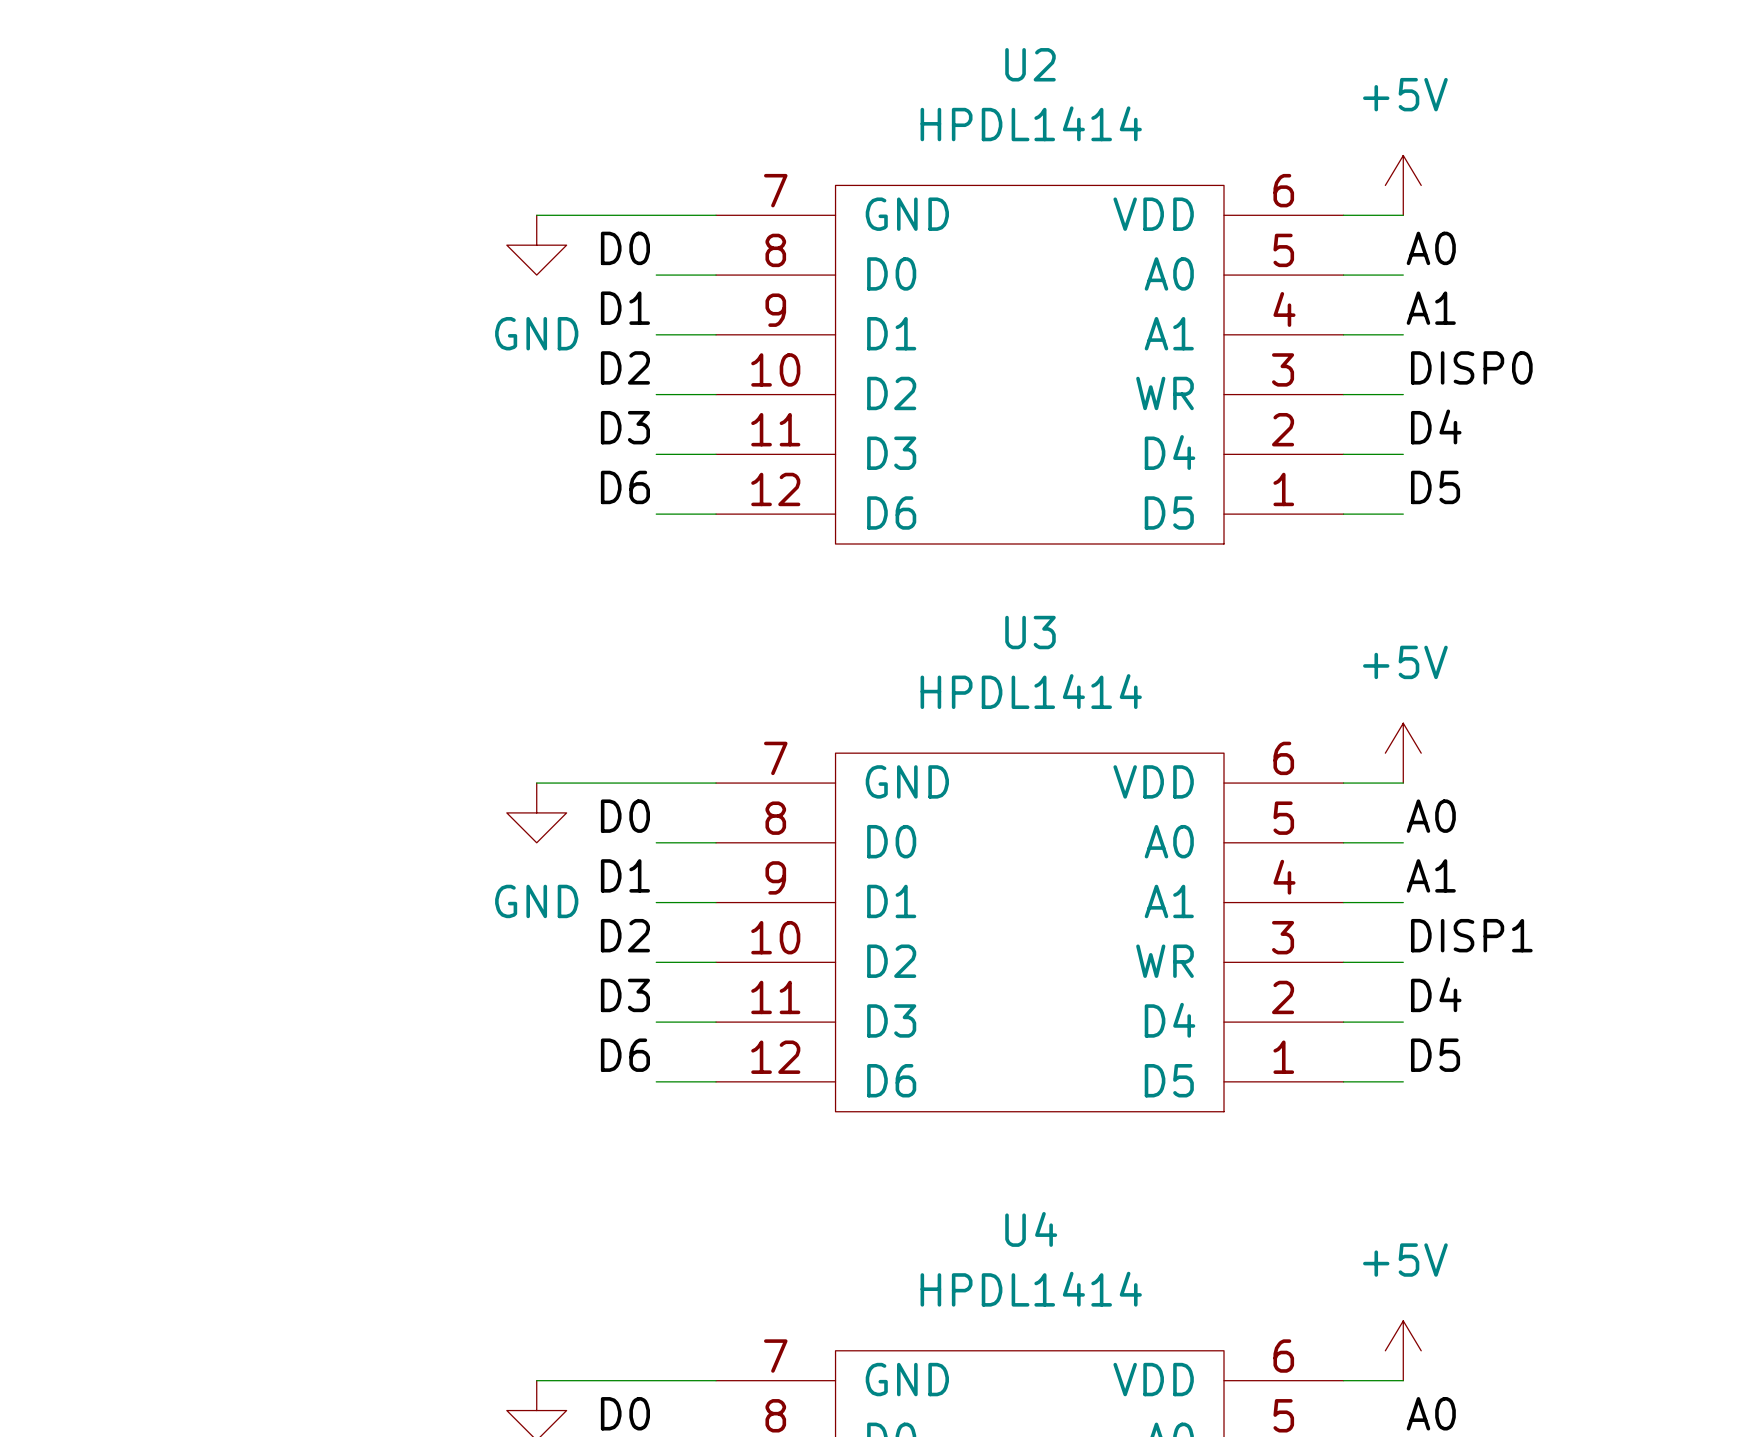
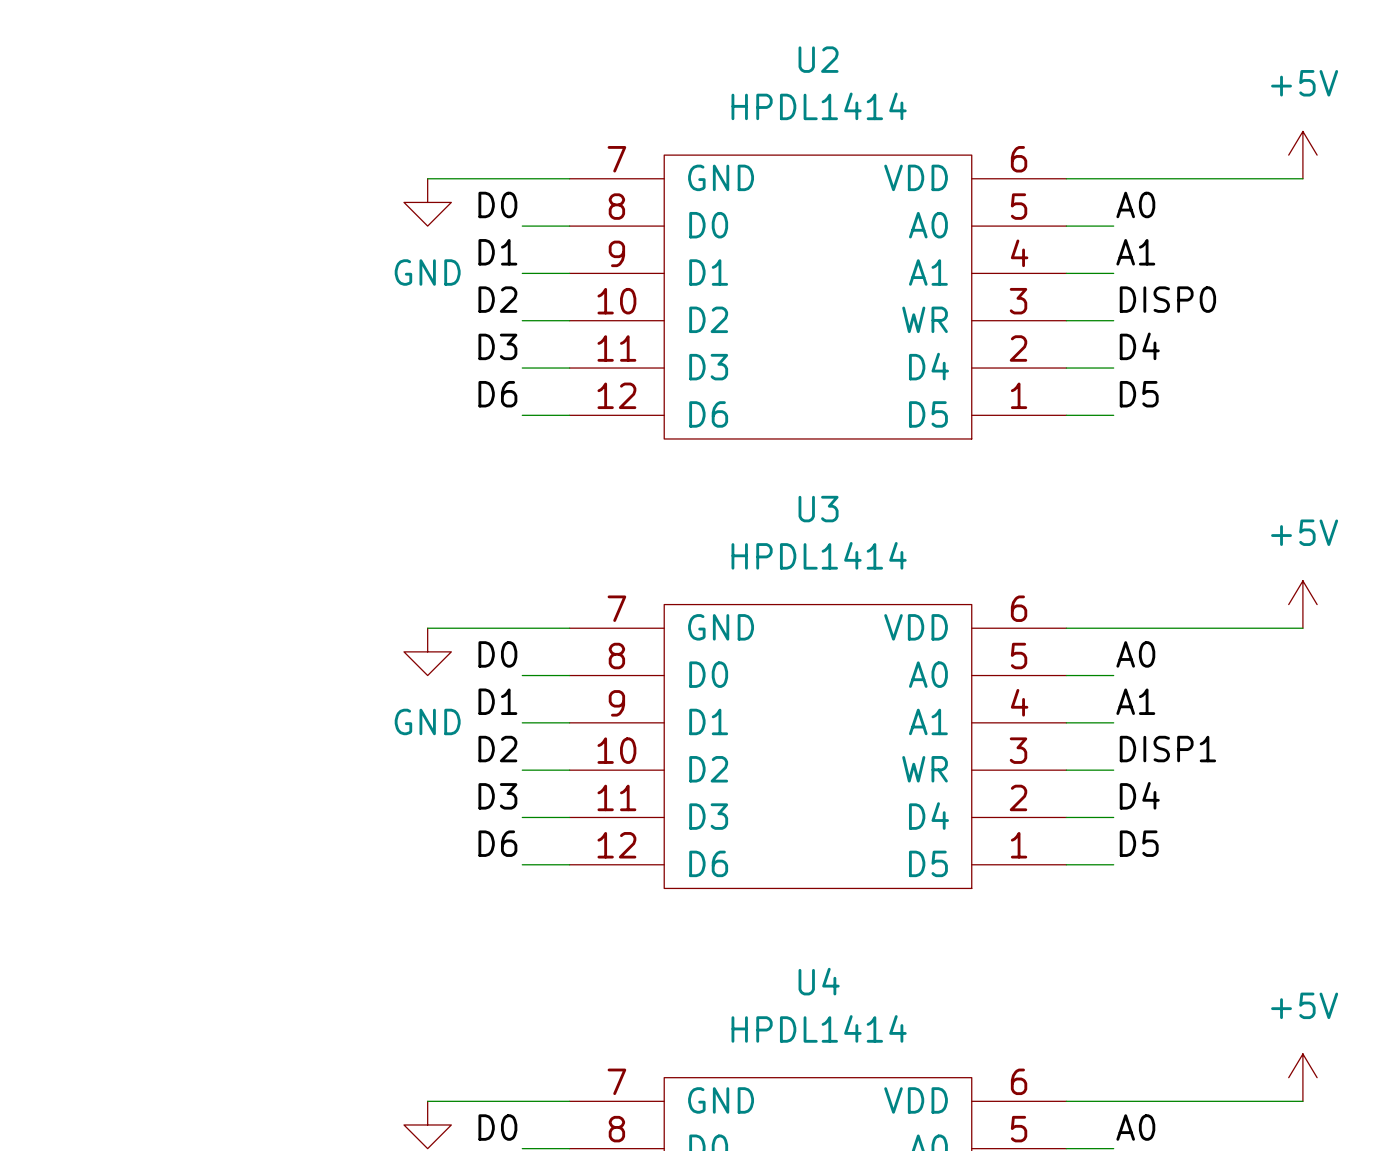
power symbol position: +5V (1403, 185) -> +5V (1302, 155)
wire: none -> (1113, 178) (1302, 178)
power symbol position: +5V (1403, 753) -> +5V (1302, 604)
wire: none -> (1113, 628) (1302, 628)
power symbol position: +5V (1403, 1350) -> +5V (1302, 1077)
wire: none -> (1113, 1101) (1302, 1101)

